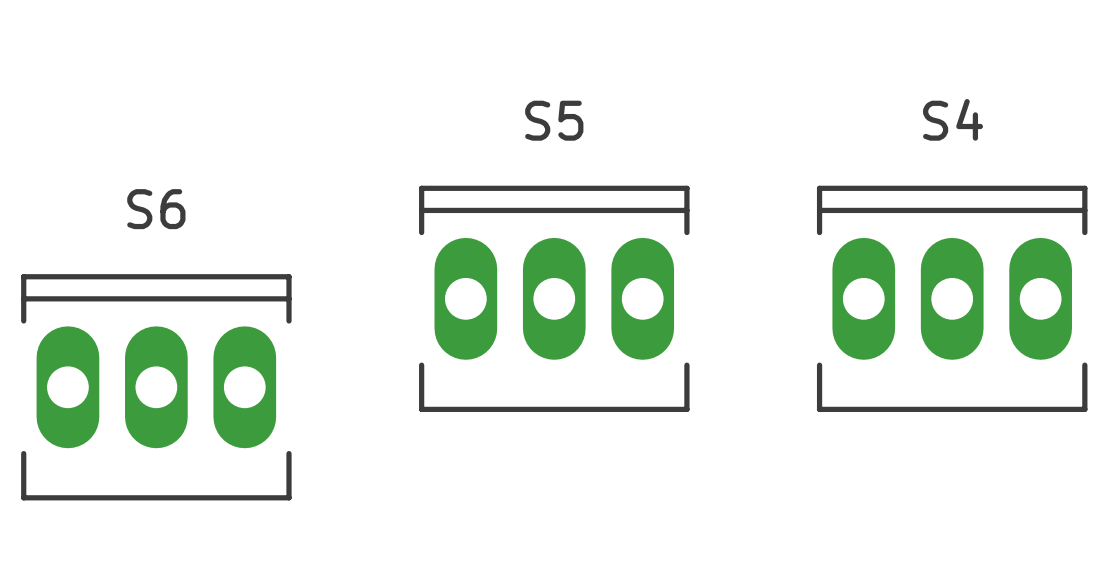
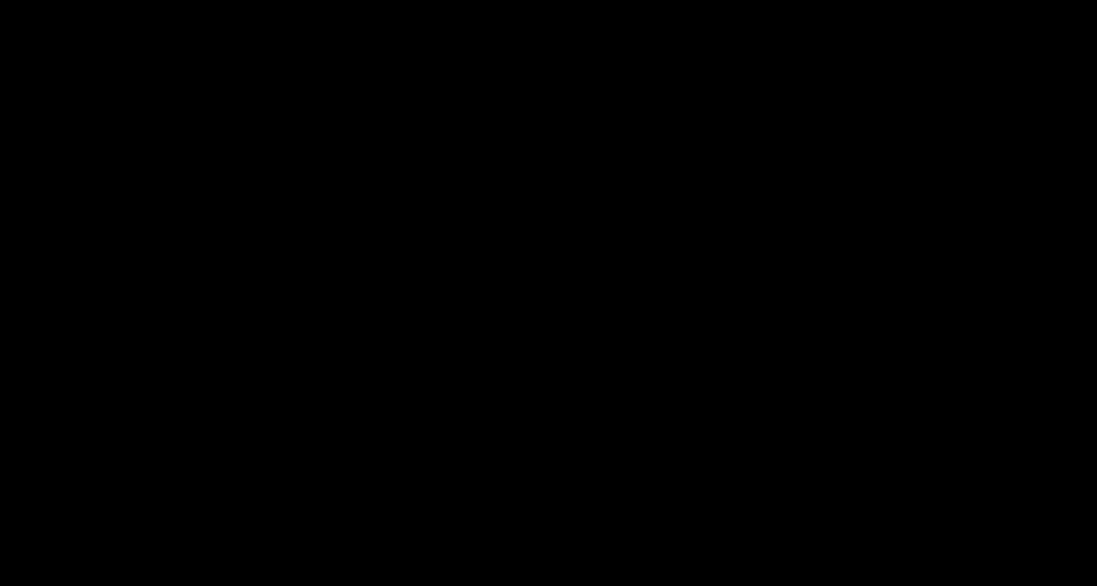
S5: (554, 298) -> none
S4: (952, 298) -> none
S6: (156, 387) -> none

